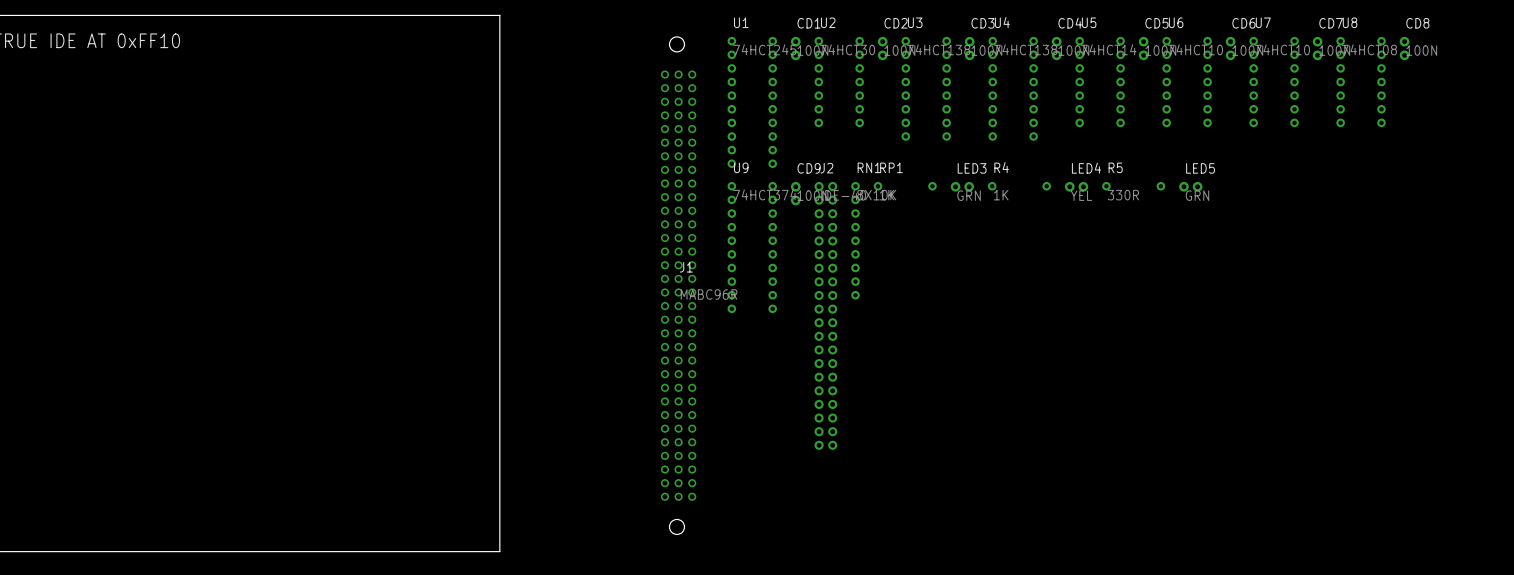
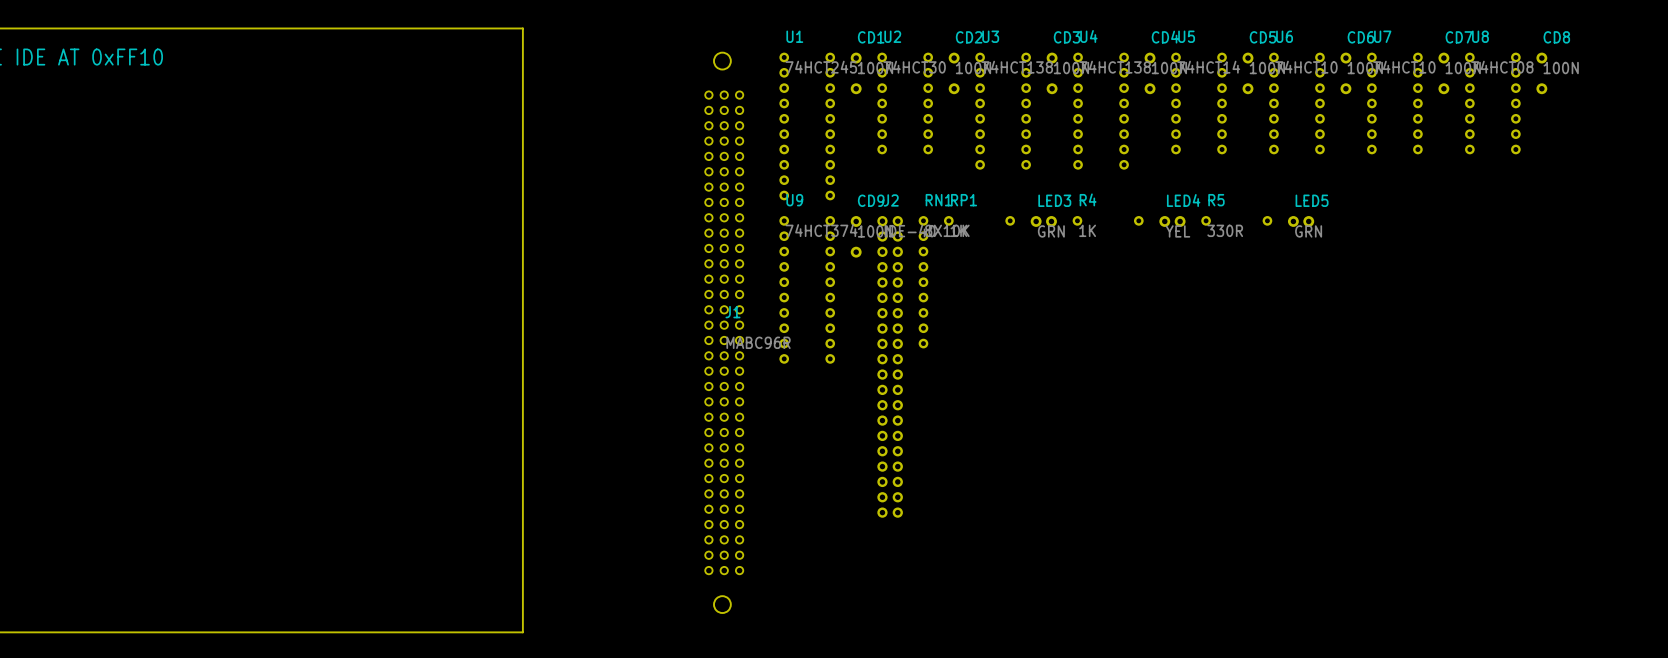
CD1 footprint: [790, 36, 801, 61] -> [850, 52, 862, 95]
CD2 footprint: [877, 36, 888, 61] -> [948, 52, 960, 95]
CD3 footprint: [964, 36, 975, 61] -> [1046, 52, 1058, 95]
CD4 footprint: [1051, 36, 1062, 61] -> [1144, 52, 1156, 95]
CD5 footprint: [1138, 36, 1149, 61] -> [1242, 52, 1254, 95]
CD6 footprint: [1225, 36, 1236, 61] -> [1340, 52, 1352, 95]
CD7 footprint: [1312, 36, 1323, 61] -> [1438, 52, 1450, 95]
CD8 footprint: [1399, 36, 1410, 61] -> [1536, 52, 1548, 95]
CD9 footprint: [790, 181, 801, 206] -> [850, 216, 862, 258]

